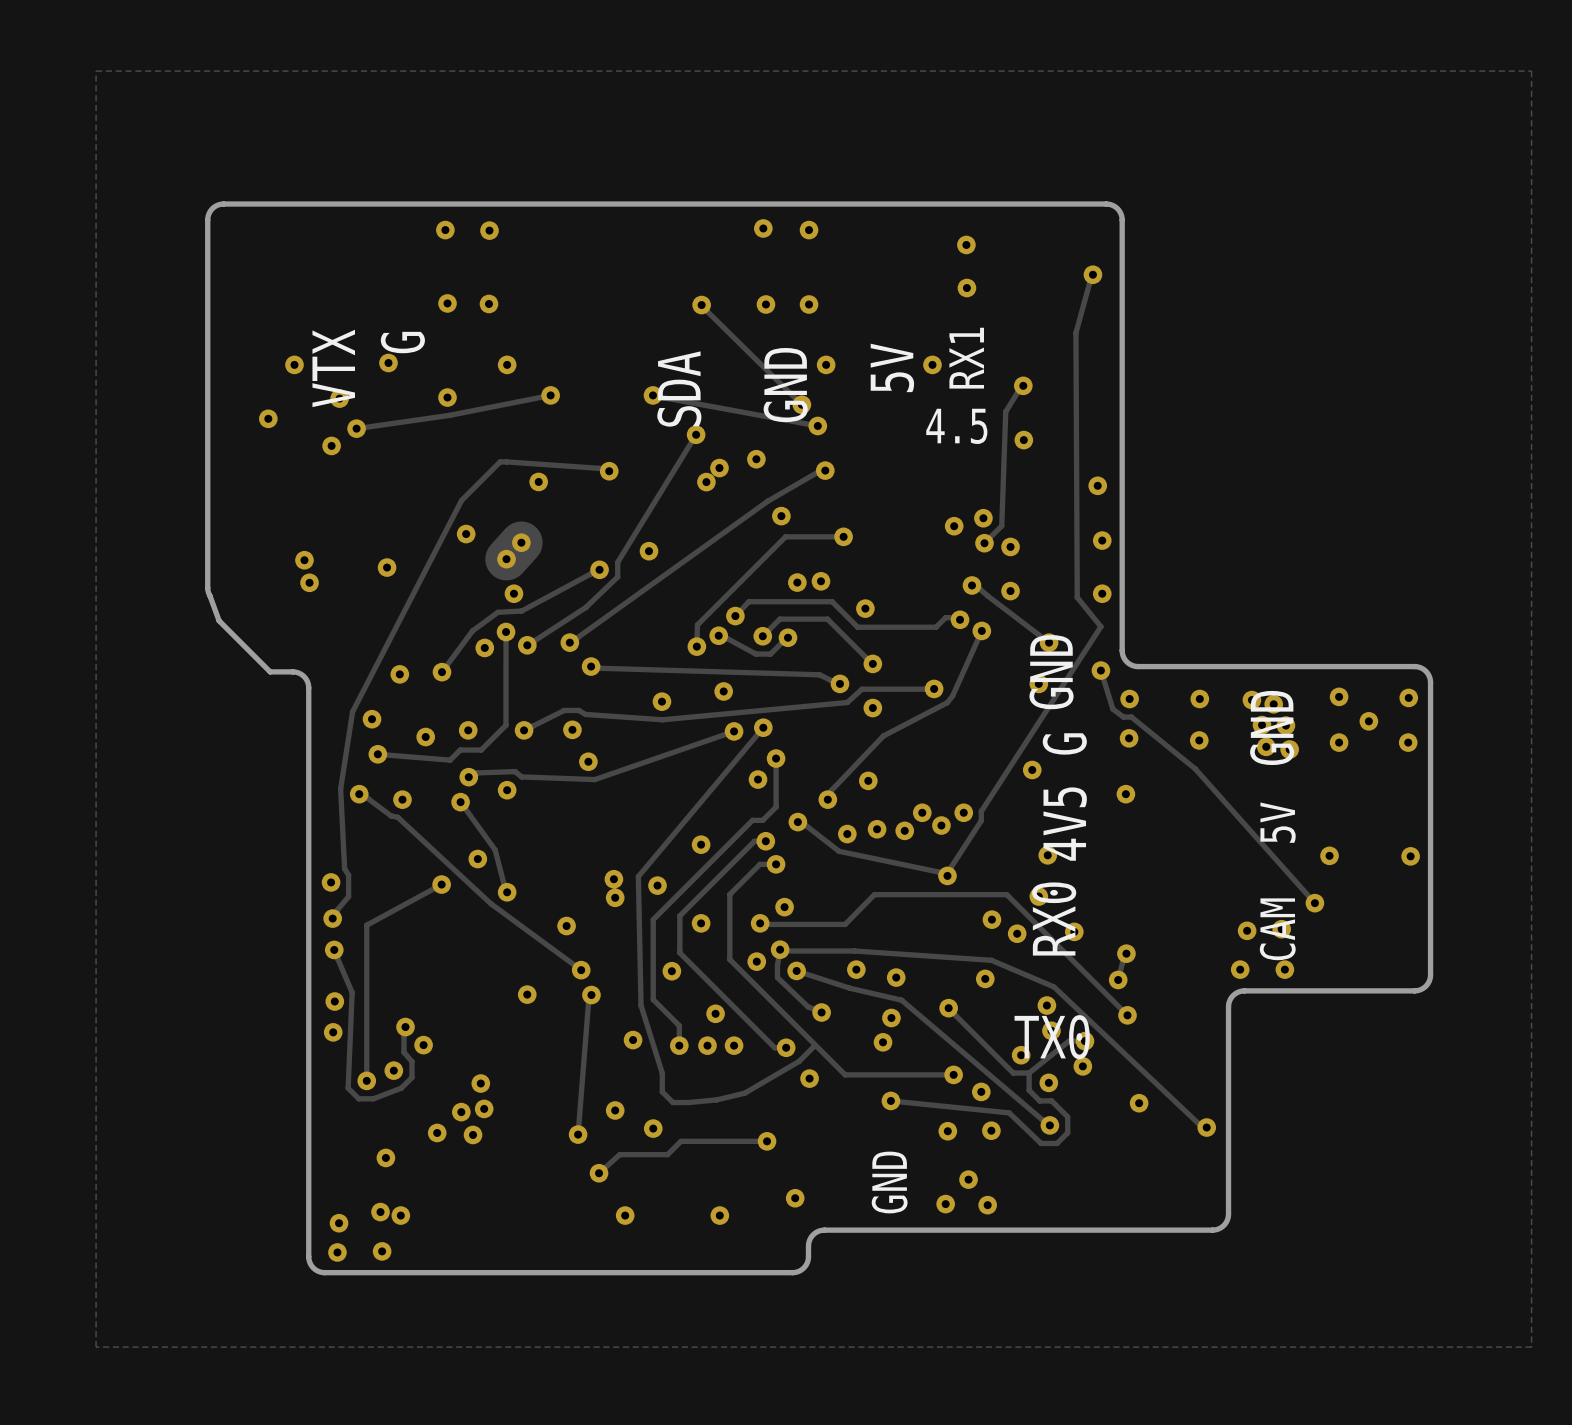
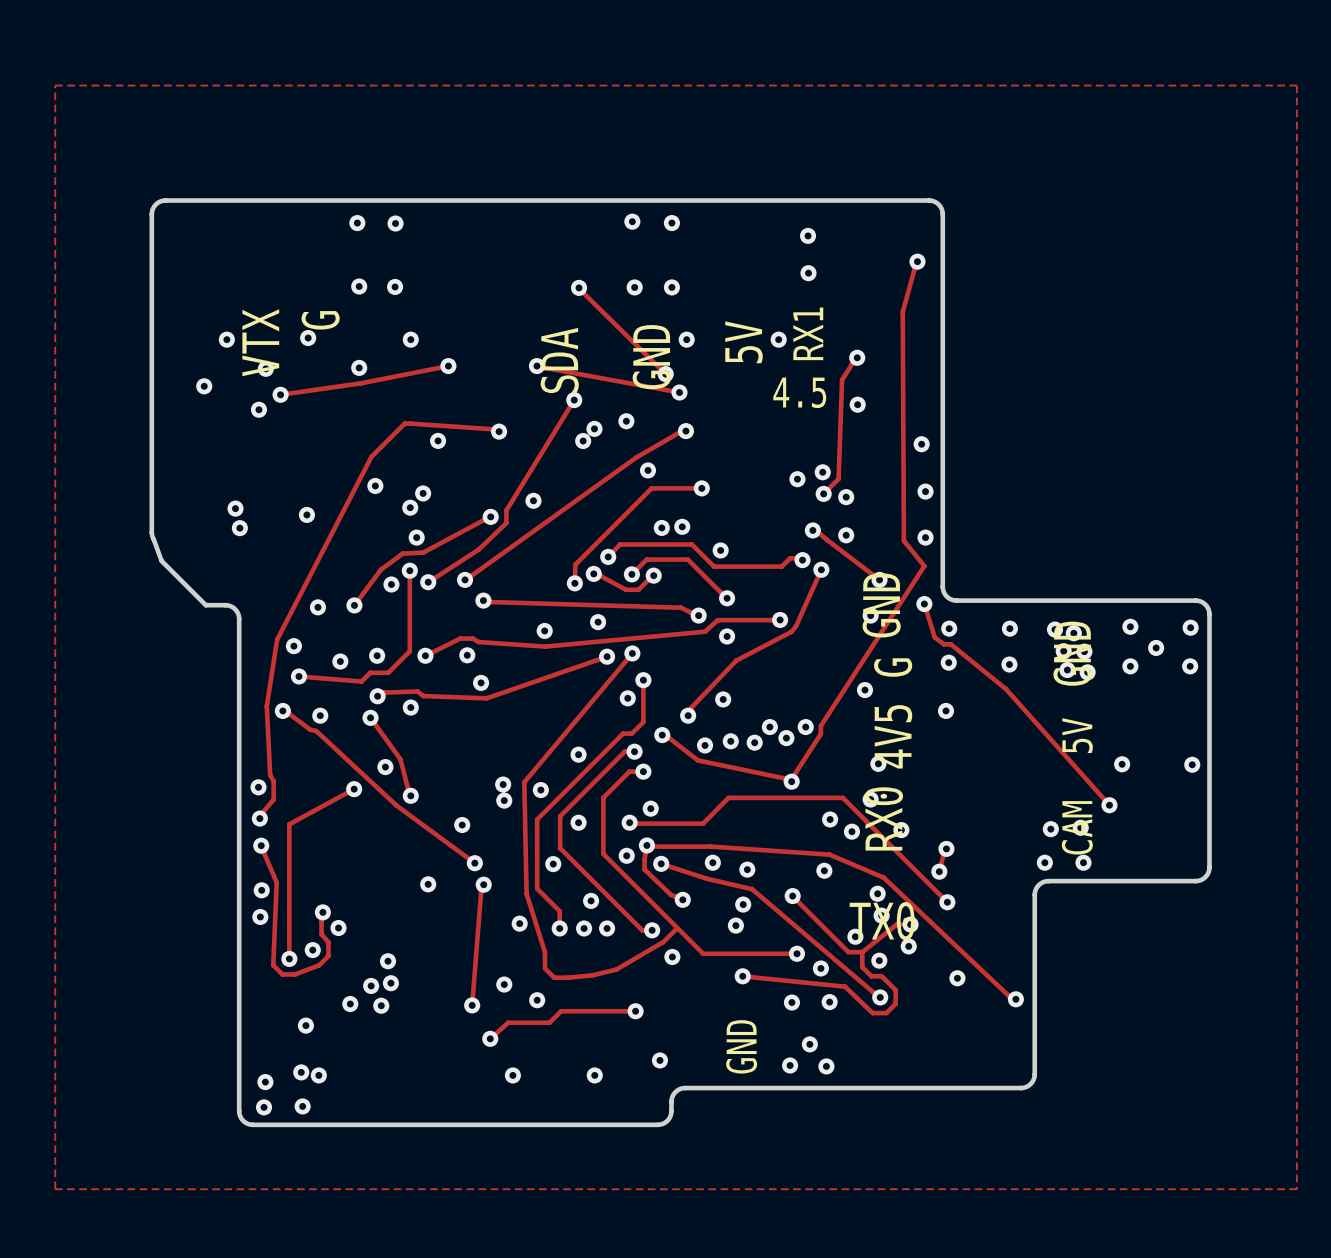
track: (521, 542) (506, 559) -> none

